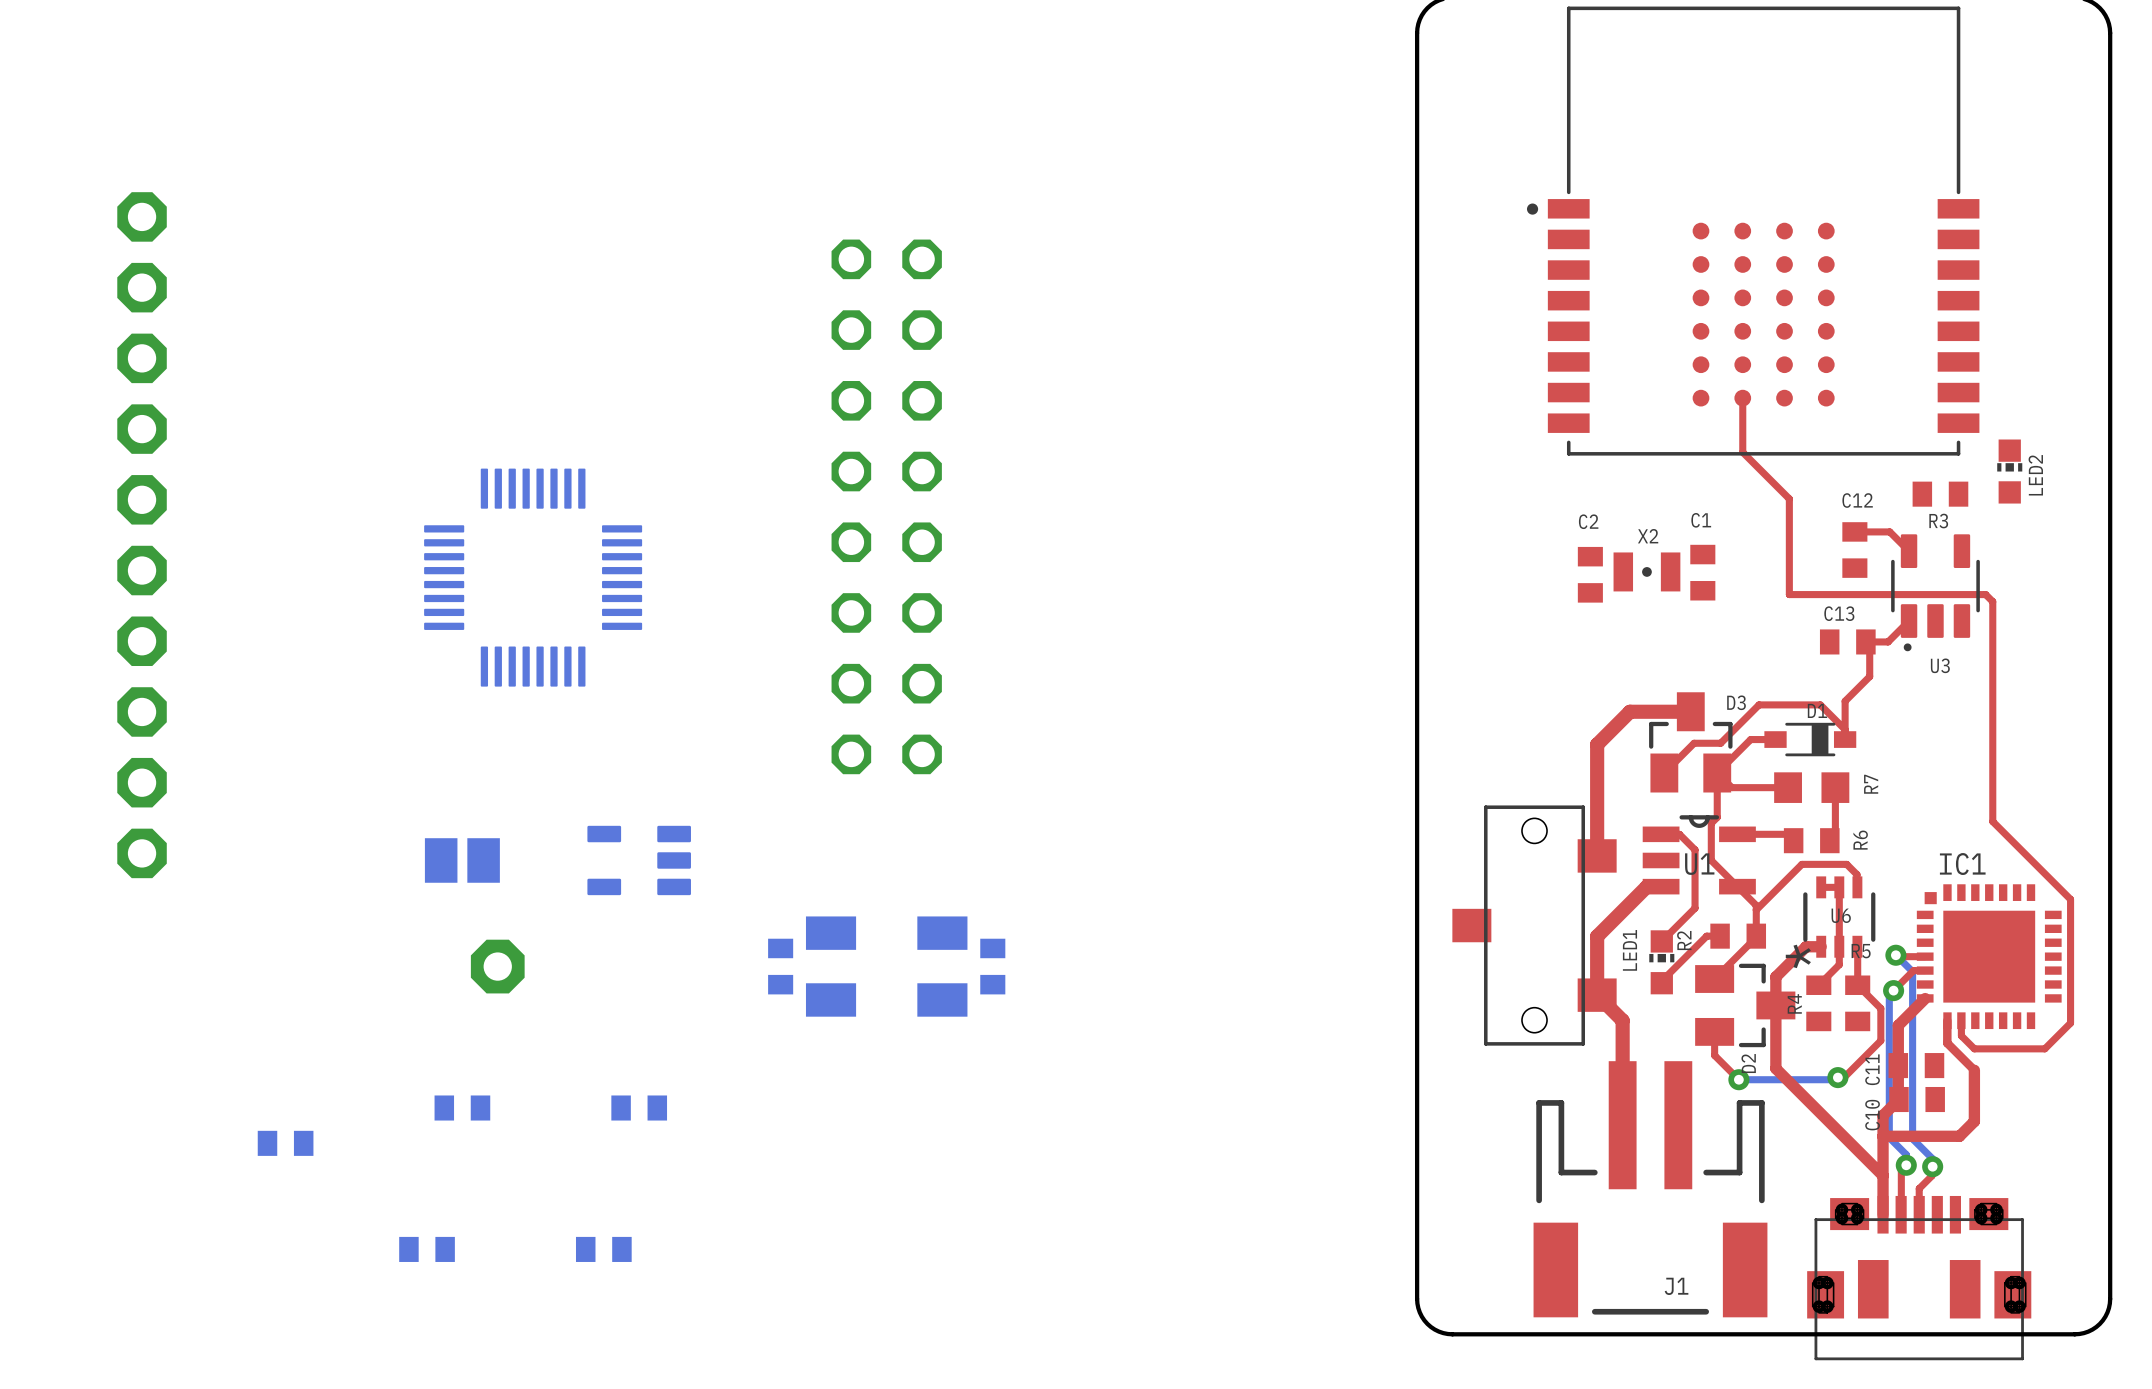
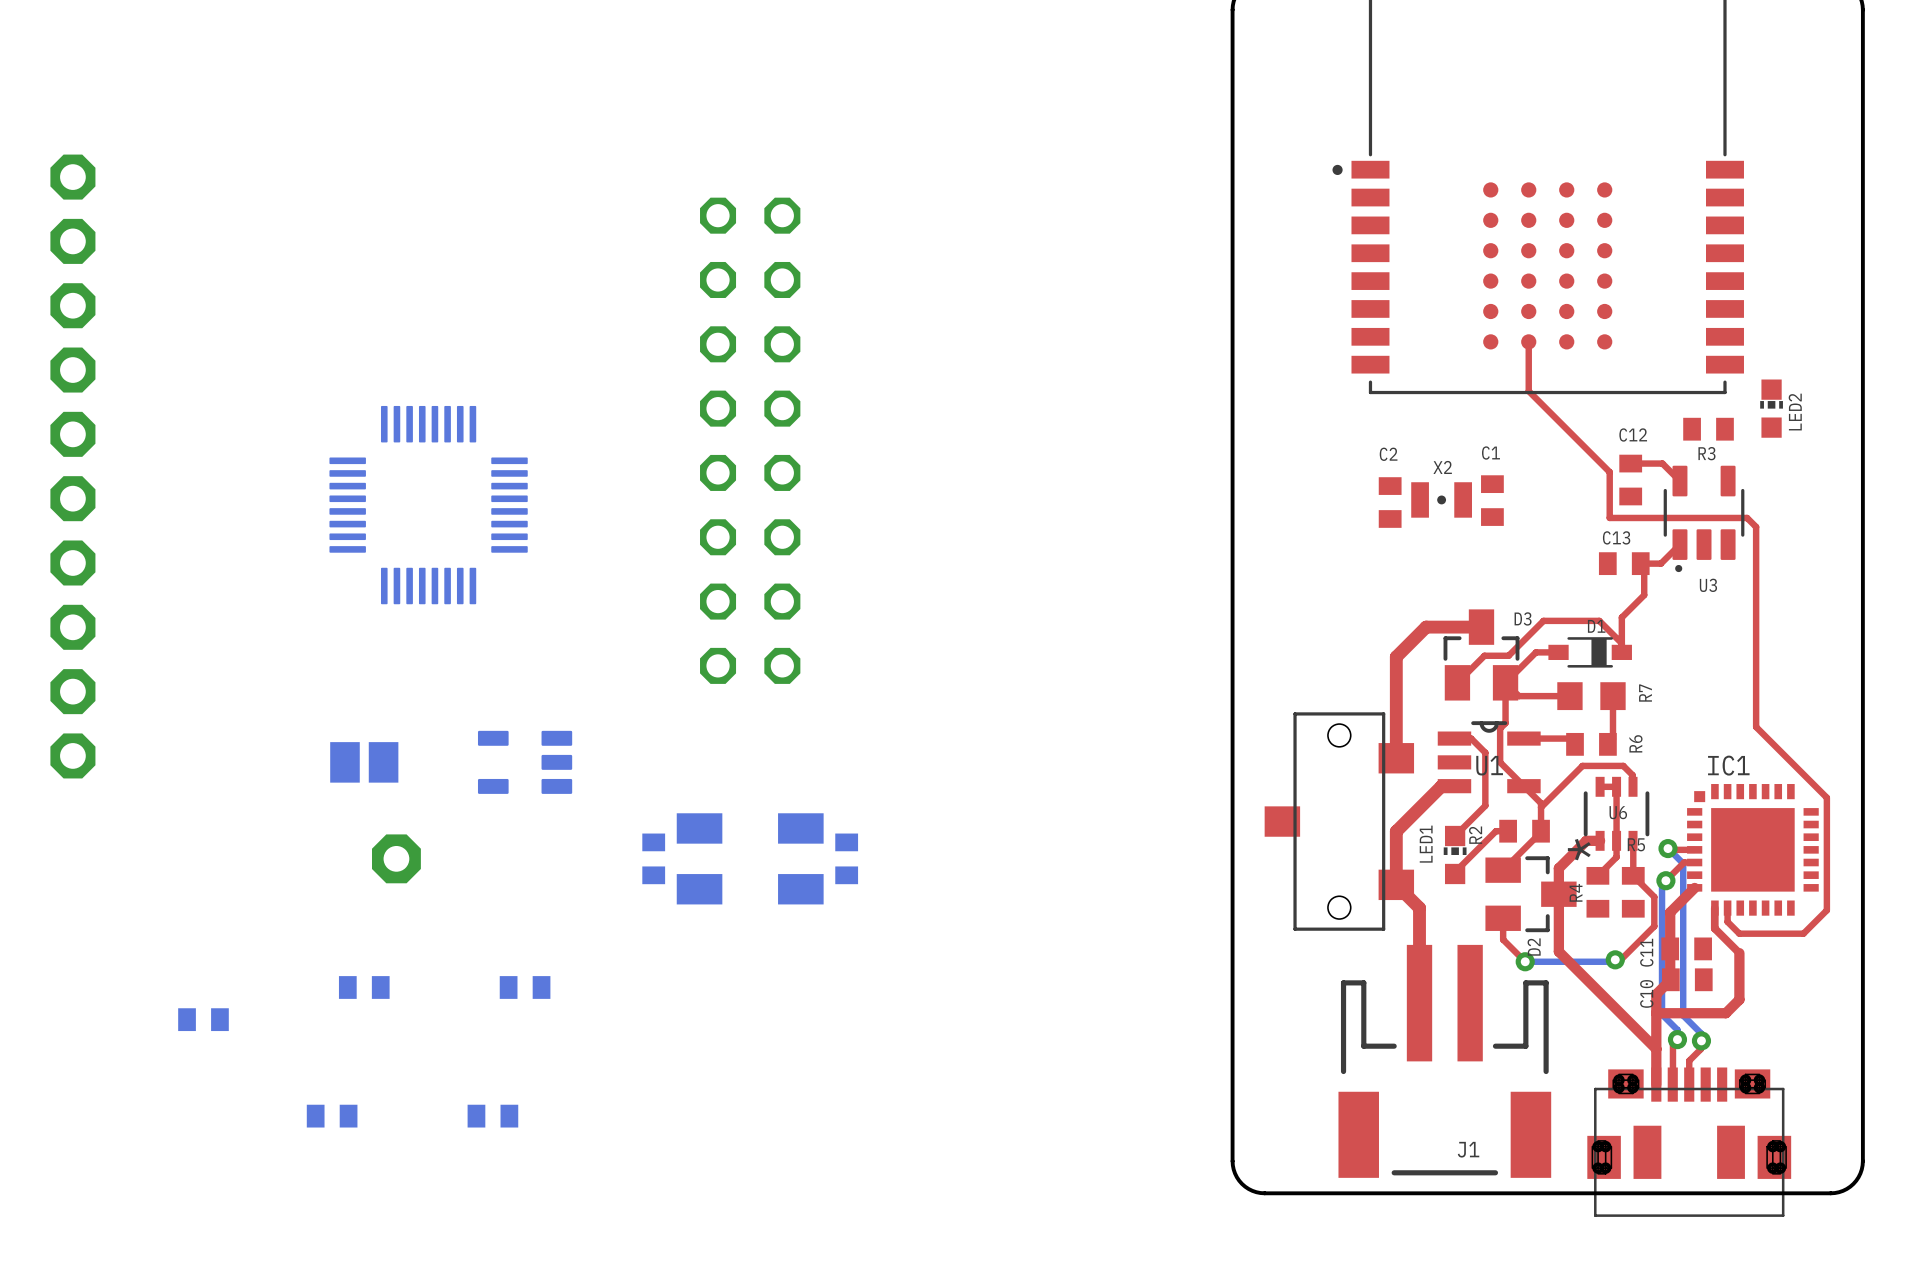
top track: (1789, 498) (1789, 594) (1985, 594) -> (1571, 433) (1609, 472) (1609, 517) (1747, 517) (1749, 520)

